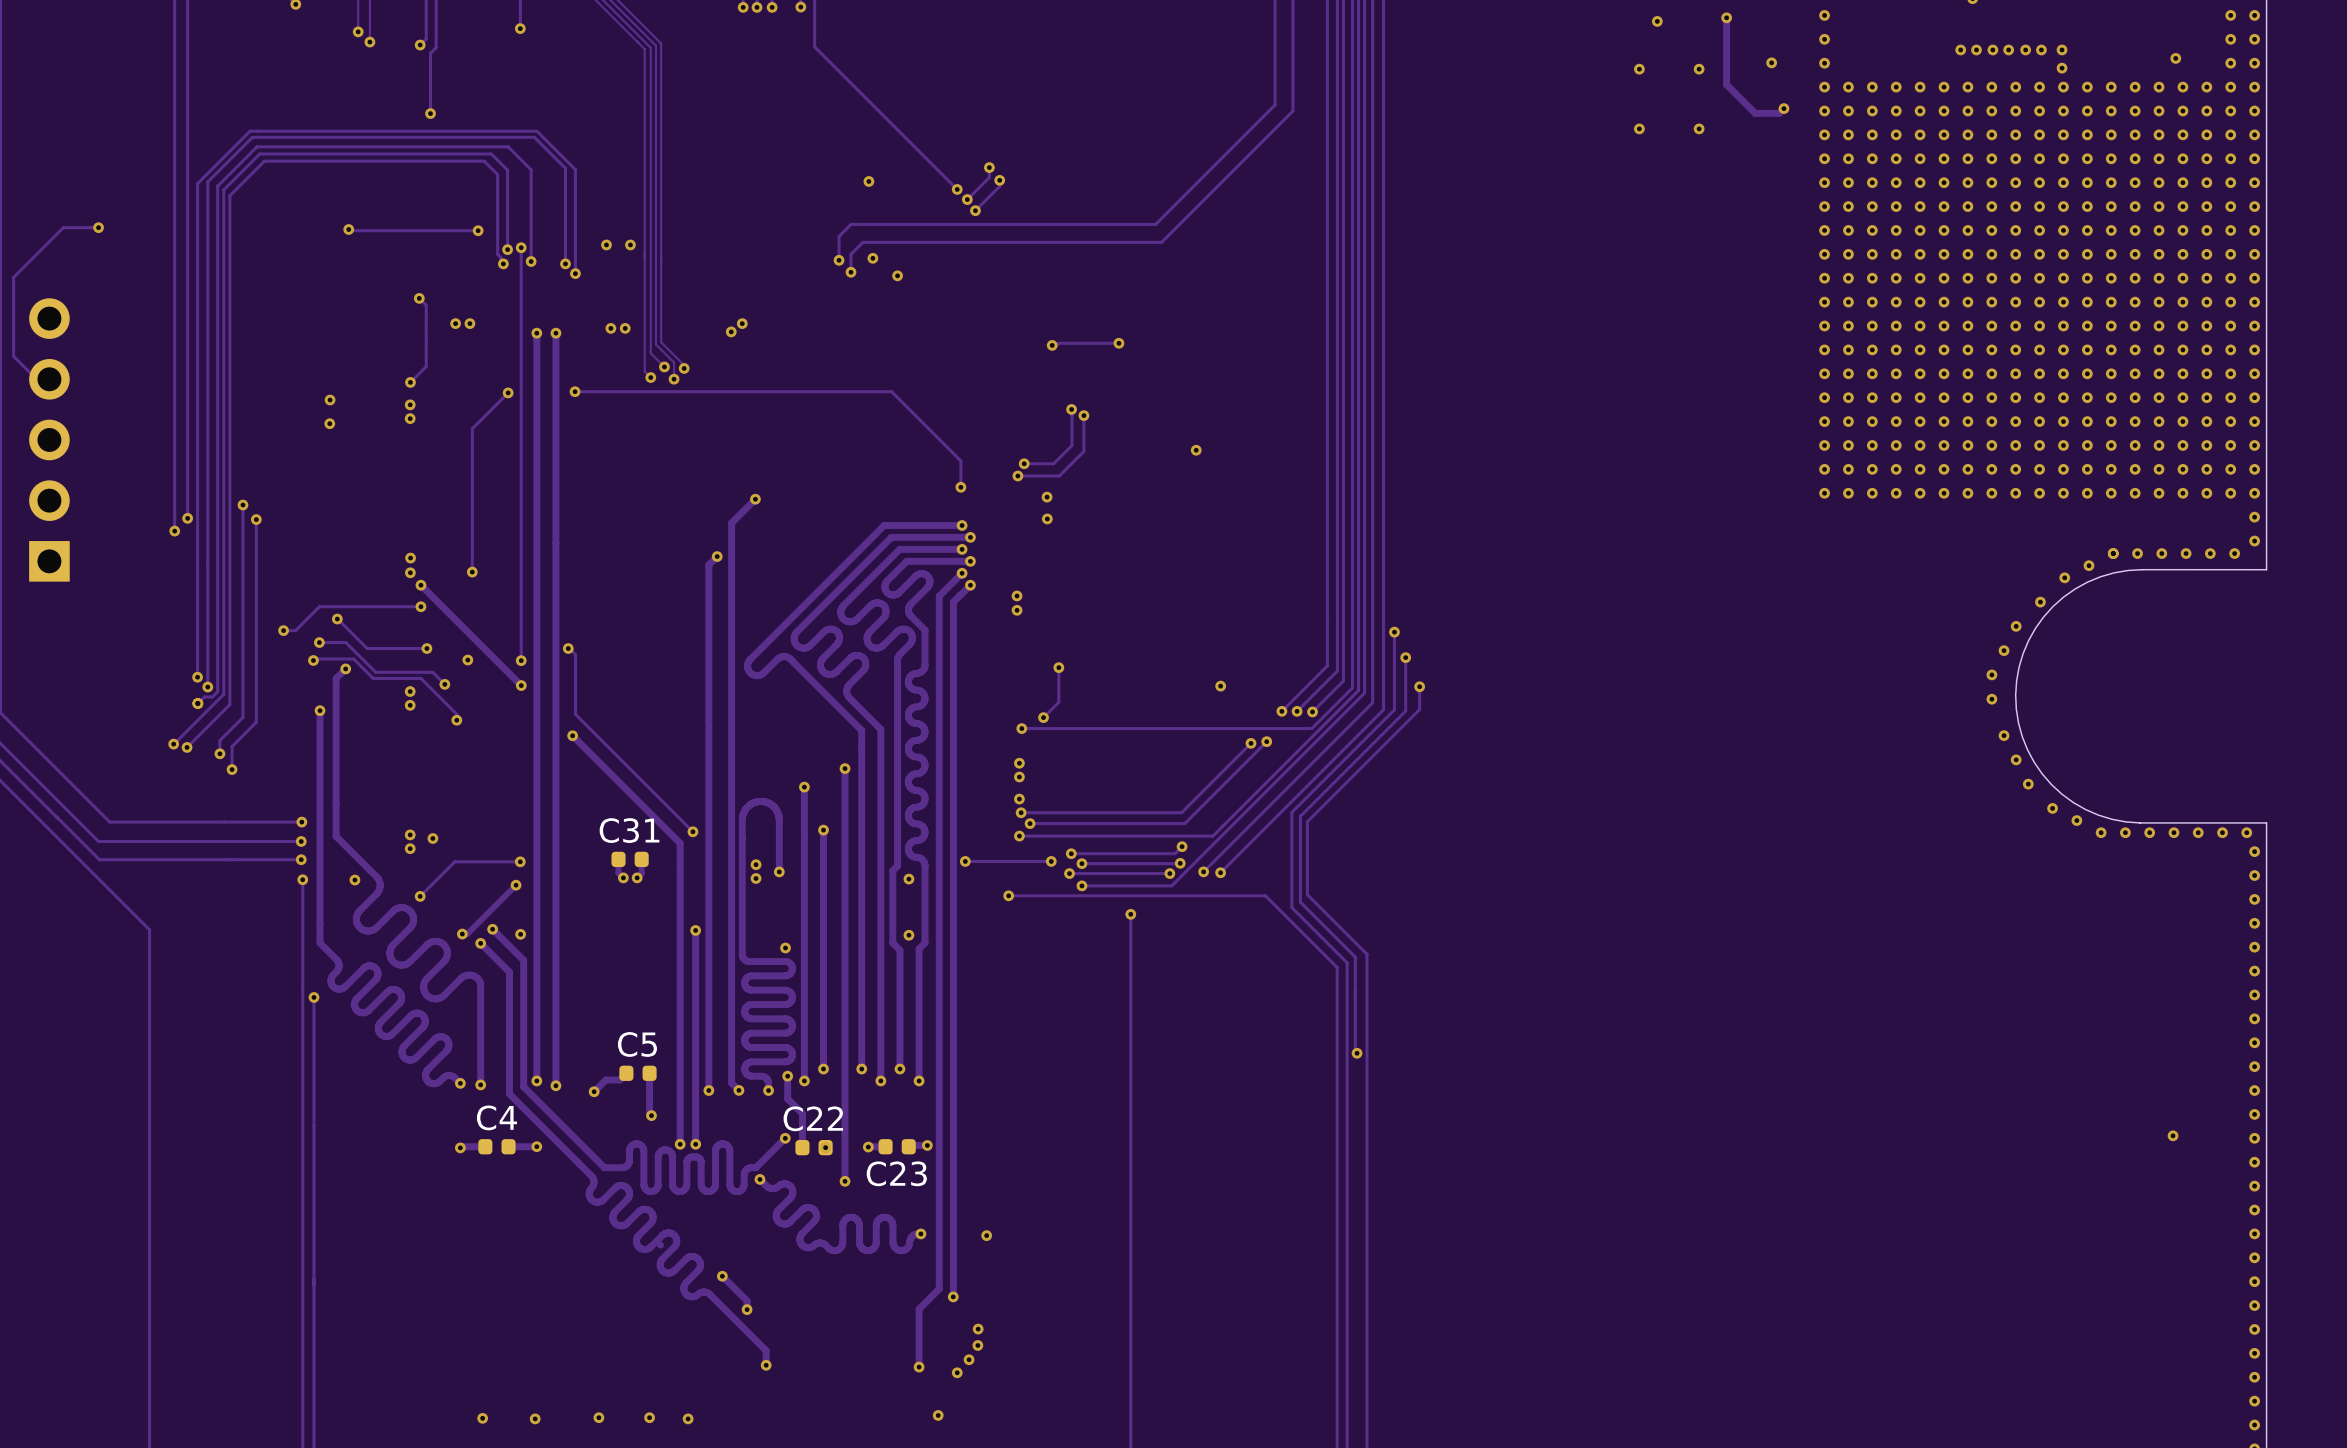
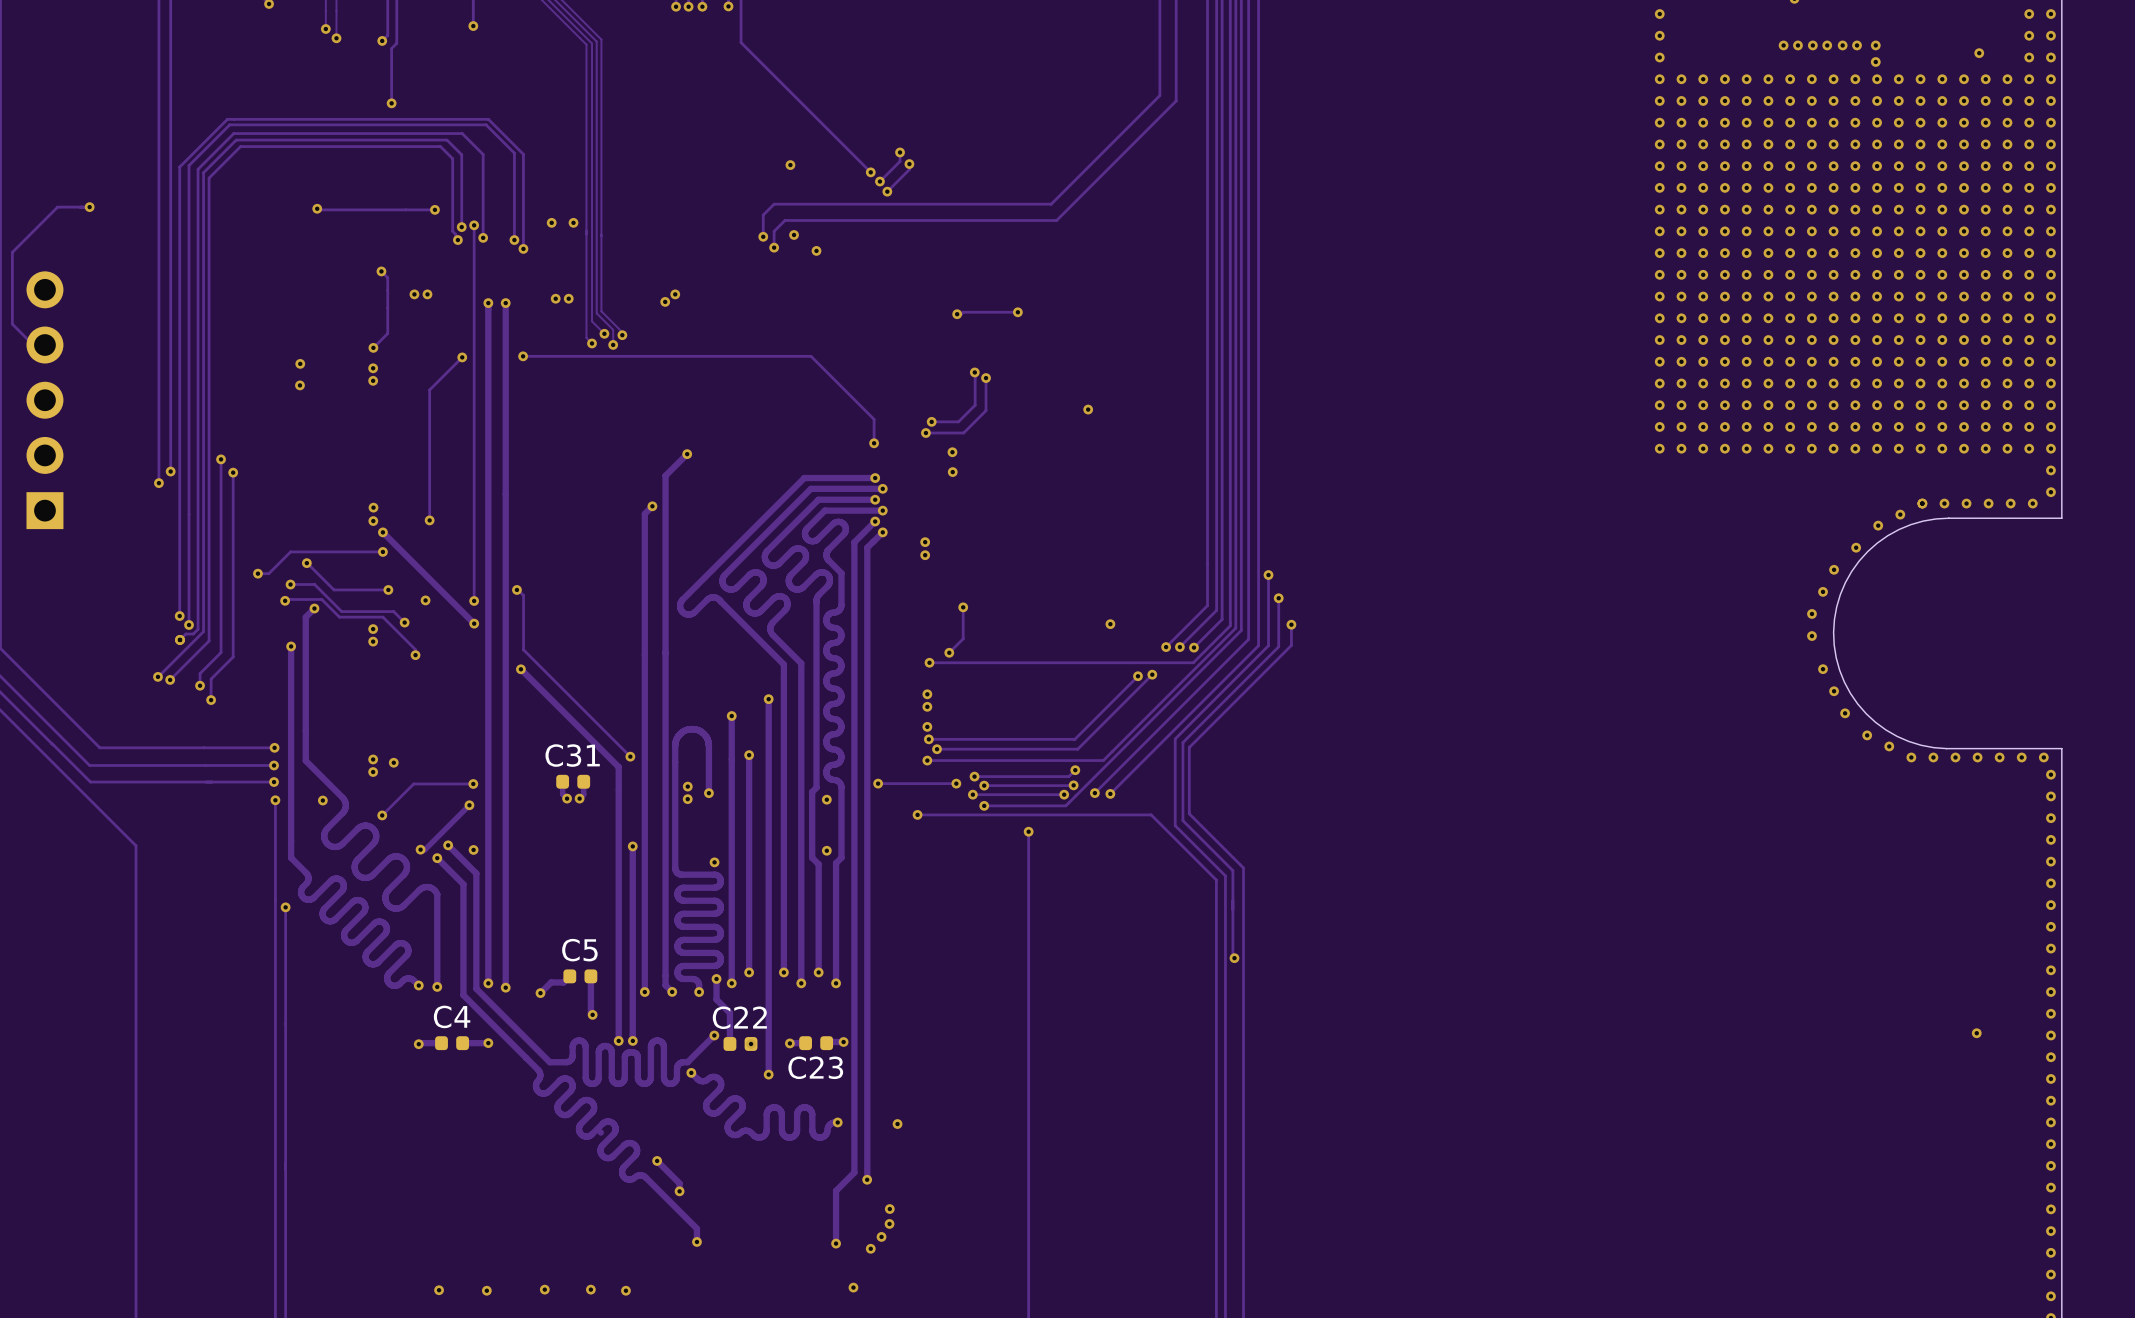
track: (1726, 17) (1726, 84) (1755, 113) (1779, 113) (1783, 108) -> none
via: (1726, 17) -> none
via: (1657, 21) -> none
via: (1771, 62) -> none
via: (1639, 69) -> none
via: (1699, 69) -> none
via: (1783, 108) -> none
via: (1639, 128) -> none
via: (1699, 128) -> none

